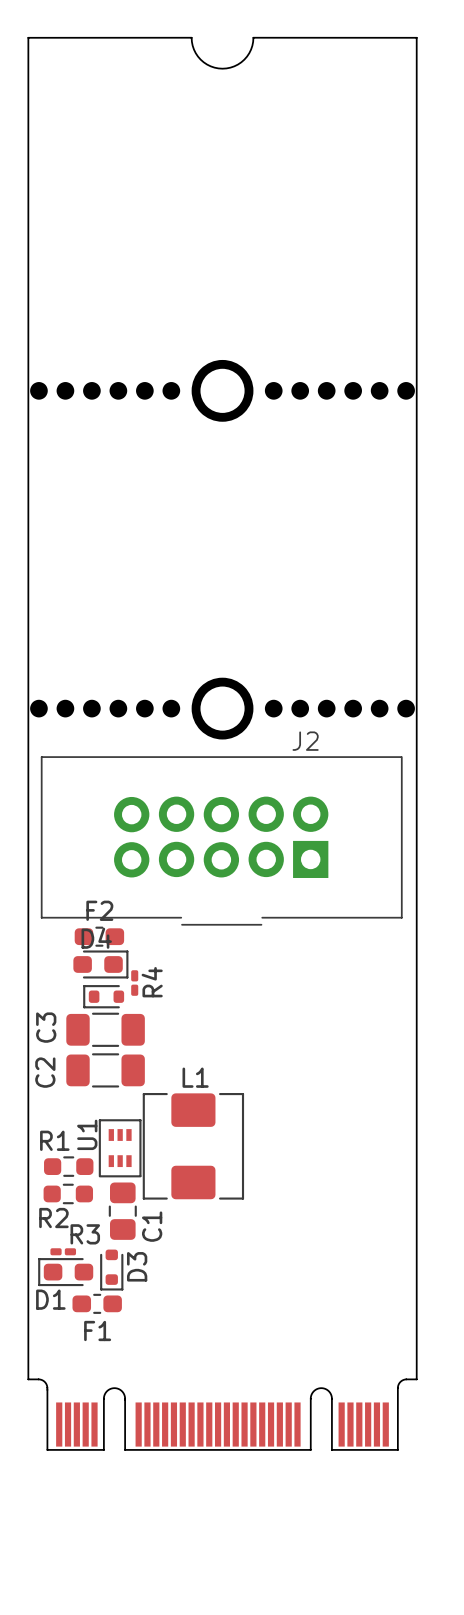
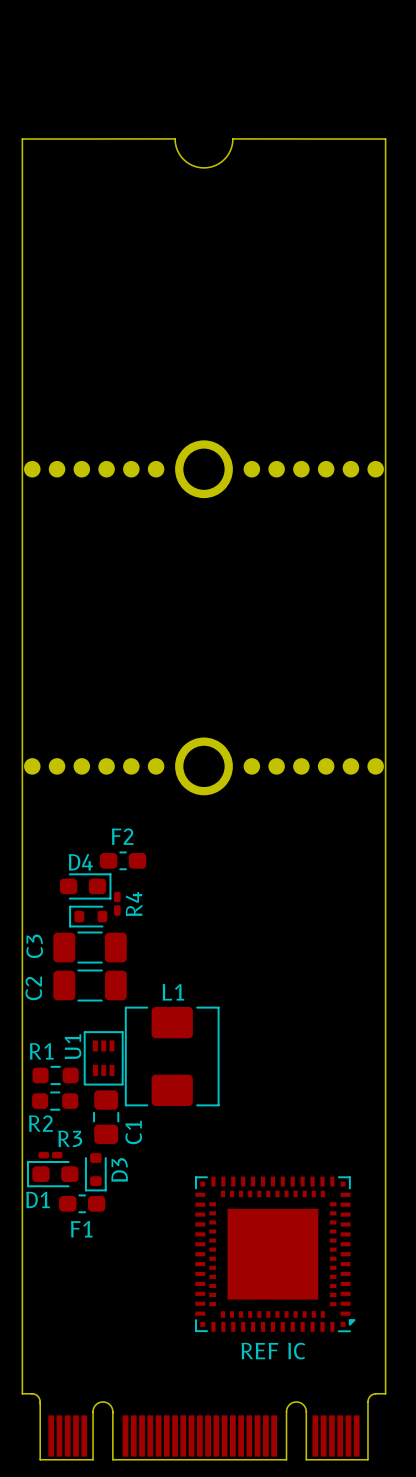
board edge: (28, 37) (191, 37) (193, 49) (200, 59) (210, 66) (222, 68) (234, 66) (244, 59) (251, 49) (253, 37) (416, 37) (416, 1379) (404, 1379) (398, 1385) (397, 1449) (331, 1449) (331, 1397) (328, 1391) (321, 1388) (313, 1391) (310, 1397) (310, 1449) (125, 1449) (125, 1397) (121, 1390) (114, 1388) (107, 1390) (103, 1397) (103, 1449) (47, 1449) (46, 1385) (41, 1380) (28, 1379) (28, 37) -> (22, 139) (175, 138) (177, 150) (183, 159) (192, 165) (203, 167) (215, 165) (224, 159) (230, 150) (232, 139) (385, 139) (385, 1393) (373, 1394) (368, 1399) (367, 1459) (306, 1459) (306, 1410) (303, 1404) (296, 1401) (289, 1404) (286, 1410) (286, 1459) (112, 1459) (112, 1410) (109, 1404) (102, 1401) (96, 1404) (93, 1410) (93, 1459) (40, 1459) (39, 1399) (35, 1394) (22, 1393) (22, 139)
round board edge: [191, 359, 254, 422] -> none
round board edge: [30, 382, 48, 400] -> none
round board edge: [56, 382, 75, 400] -> none
round board edge: [83, 382, 101, 400] -> none
round board edge: [109, 382, 128, 400] -> none
round board edge: [136, 382, 154, 400] -> none
round board edge: [162, 382, 181, 400] -> none
round board edge: [264, 382, 283, 400] -> none
round board edge: [291, 382, 310, 400] -> none
round board edge: [317, 382, 336, 400] -> none
round board edge: [344, 382, 362, 400] -> none
round board edge: [370, 382, 389, 400] -> none
round board edge: [397, 382, 415, 400] -> none
round board edge: none -> [175, 440, 233, 499]
round board edge: none -> [24, 460, 41, 478]
round board edge: none -> [48, 460, 66, 478]
round board edge: none -> [73, 460, 91, 478]
round board edge: none -> [98, 460, 115, 478]
round board edge: none -> [123, 460, 140, 478]
round board edge: none -> [147, 460, 165, 478]
round board edge: none -> [243, 460, 261, 478]
round board edge: none -> [268, 460, 285, 478]
round board edge: none -> [293, 460, 310, 478]
round board edge: none -> [317, 460, 335, 478]
round board edge: none -> [342, 460, 360, 478]
round board edge: none -> [367, 460, 384, 478]
round board edge: [191, 677, 254, 740] -> none
round board edge: [30, 699, 48, 718] -> none
round board edge: [56, 699, 75, 718] -> none
round board edge: [83, 699, 101, 718] -> none
round board edge: [109, 699, 128, 718] -> none
round board edge: [136, 699, 154, 718] -> none
round board edge: [162, 699, 181, 718] -> none
round board edge: [264, 699, 283, 718] -> none
round board edge: [291, 699, 310, 718] -> none
round board edge: [317, 699, 336, 718] -> none
round board edge: [344, 699, 362, 718] -> none
round board edge: [370, 699, 389, 718] -> none
round board edge: [397, 699, 415, 718] -> none
round board edge: none -> [175, 737, 233, 796]
round board edge: none -> [24, 758, 41, 775]
round board edge: none -> [48, 758, 66, 775]
round board edge: none -> [73, 758, 91, 775]
round board edge: none -> [98, 758, 115, 775]
round board edge: none -> [123, 758, 140, 775]
round board edge: none -> [147, 758, 165, 775]
round board edge: none -> [243, 758, 261, 775]
round board edge: none -> [268, 758, 285, 775]
round board edge: none -> [293, 758, 310, 775]
round board edge: none -> [317, 758, 335, 775]
round board edge: none -> [342, 758, 360, 775]
round board edge: none -> [367, 758, 384, 775]
J2: (221, 840) -> none
F2 position: (99, 936) -> (123, 860)
REF IC: none -> (275, 1254)
part position: (222, 1424) -> (203, 1435)

